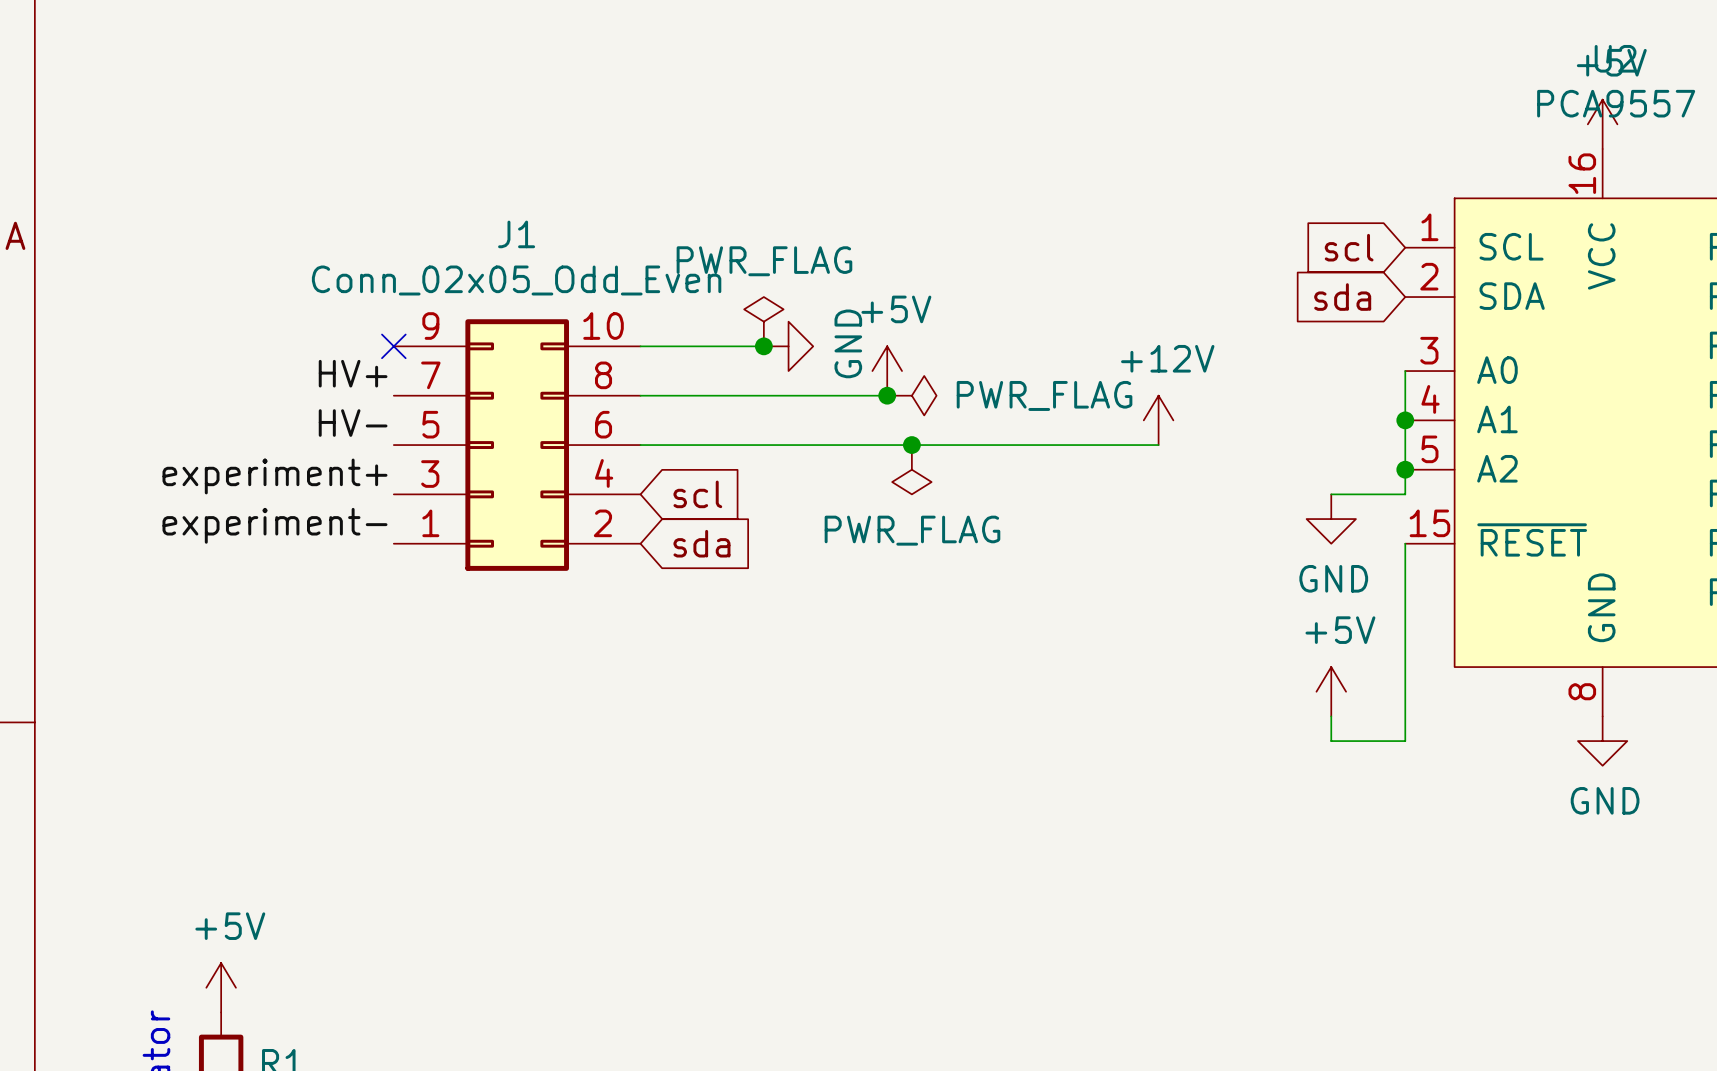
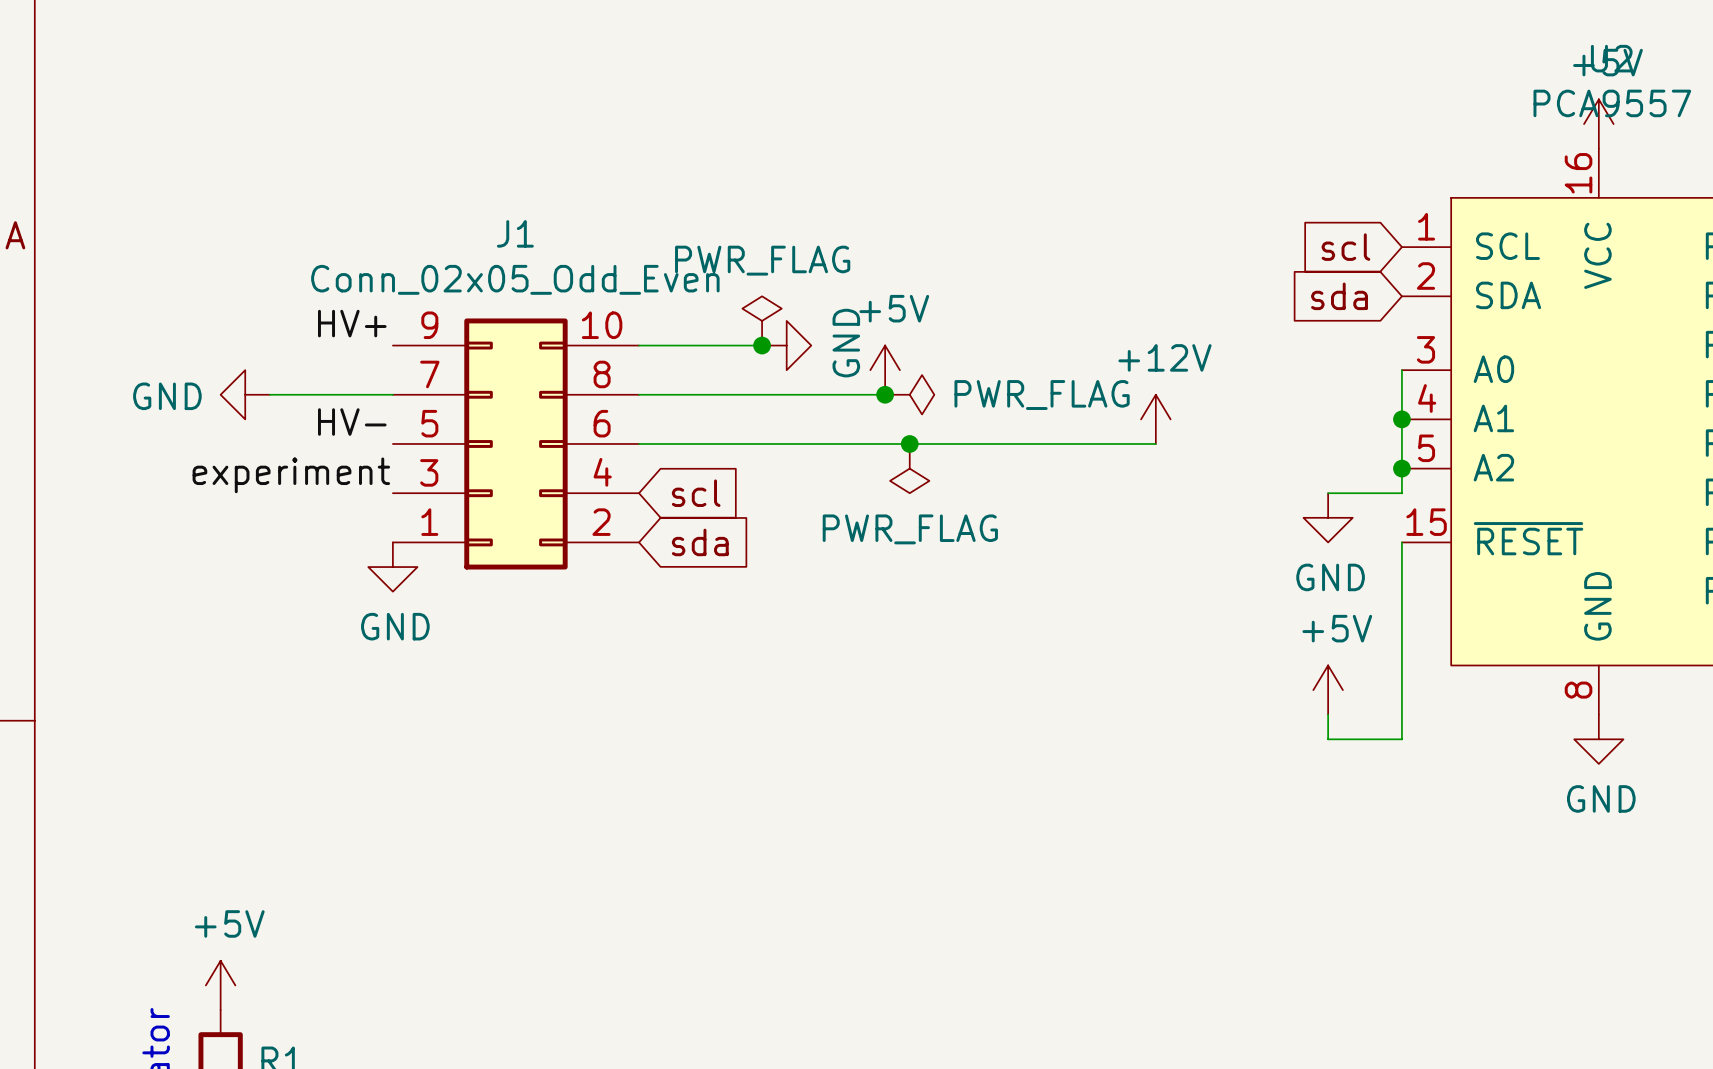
no-connect mark: (393, 346) -> none
label position: HV+ (353, 373) -> HV+ (352, 323)
power symbol: none -> GND (245, 394)
wire: none -> (269, 394) (392, 394)
label: experiment+ (275, 476) -> experiment (291, 475)
label: experiment- (275, 525) -> none
power symbol: none -> GND (392, 567)

